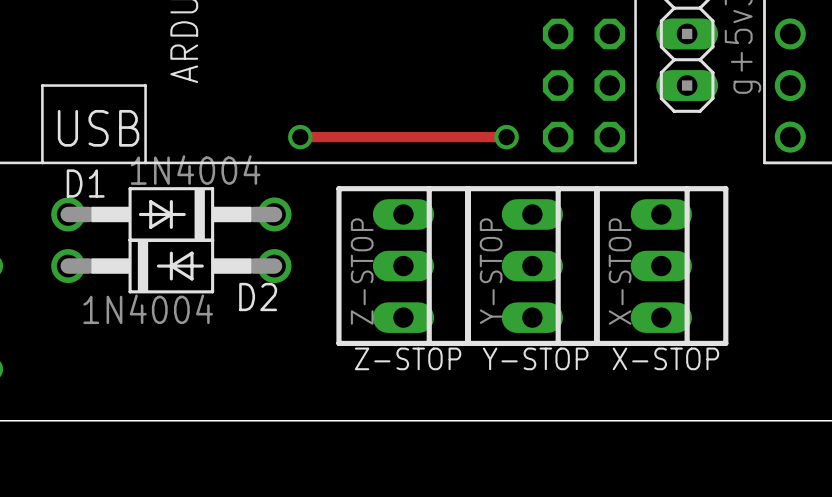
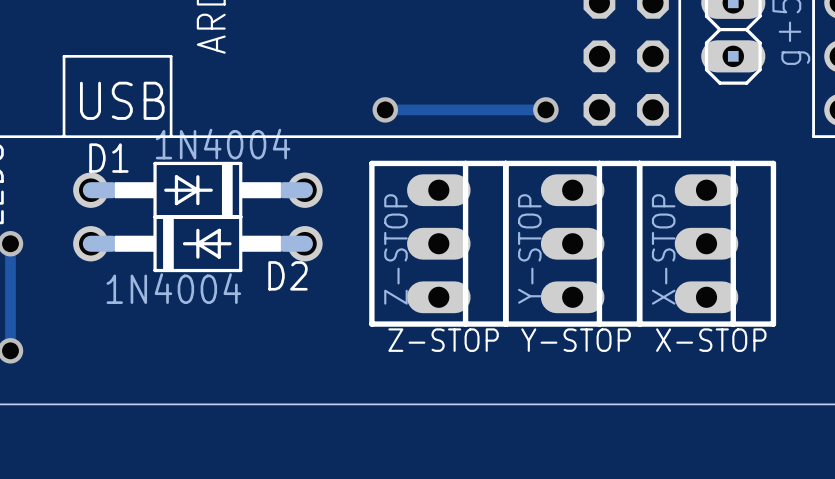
track: (300, 137) (351, 137) -> none
via position: (300, 137) -> (385, 109)

